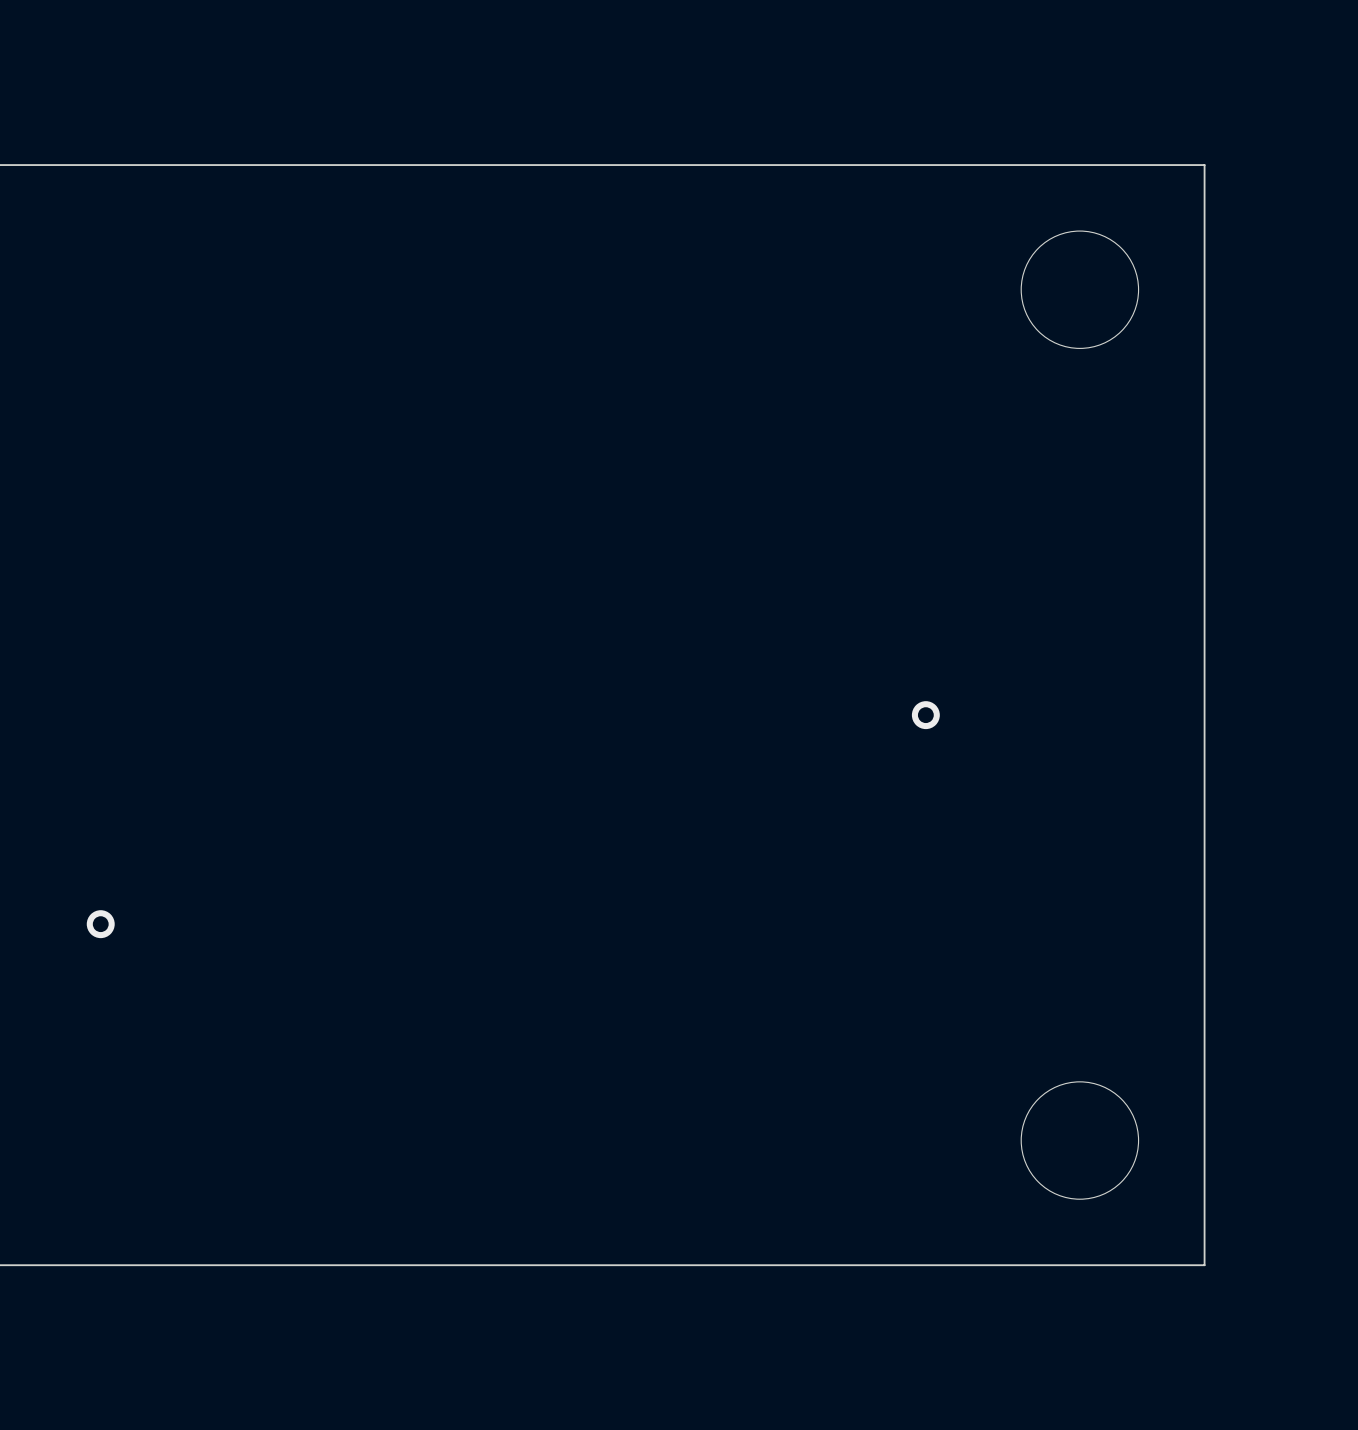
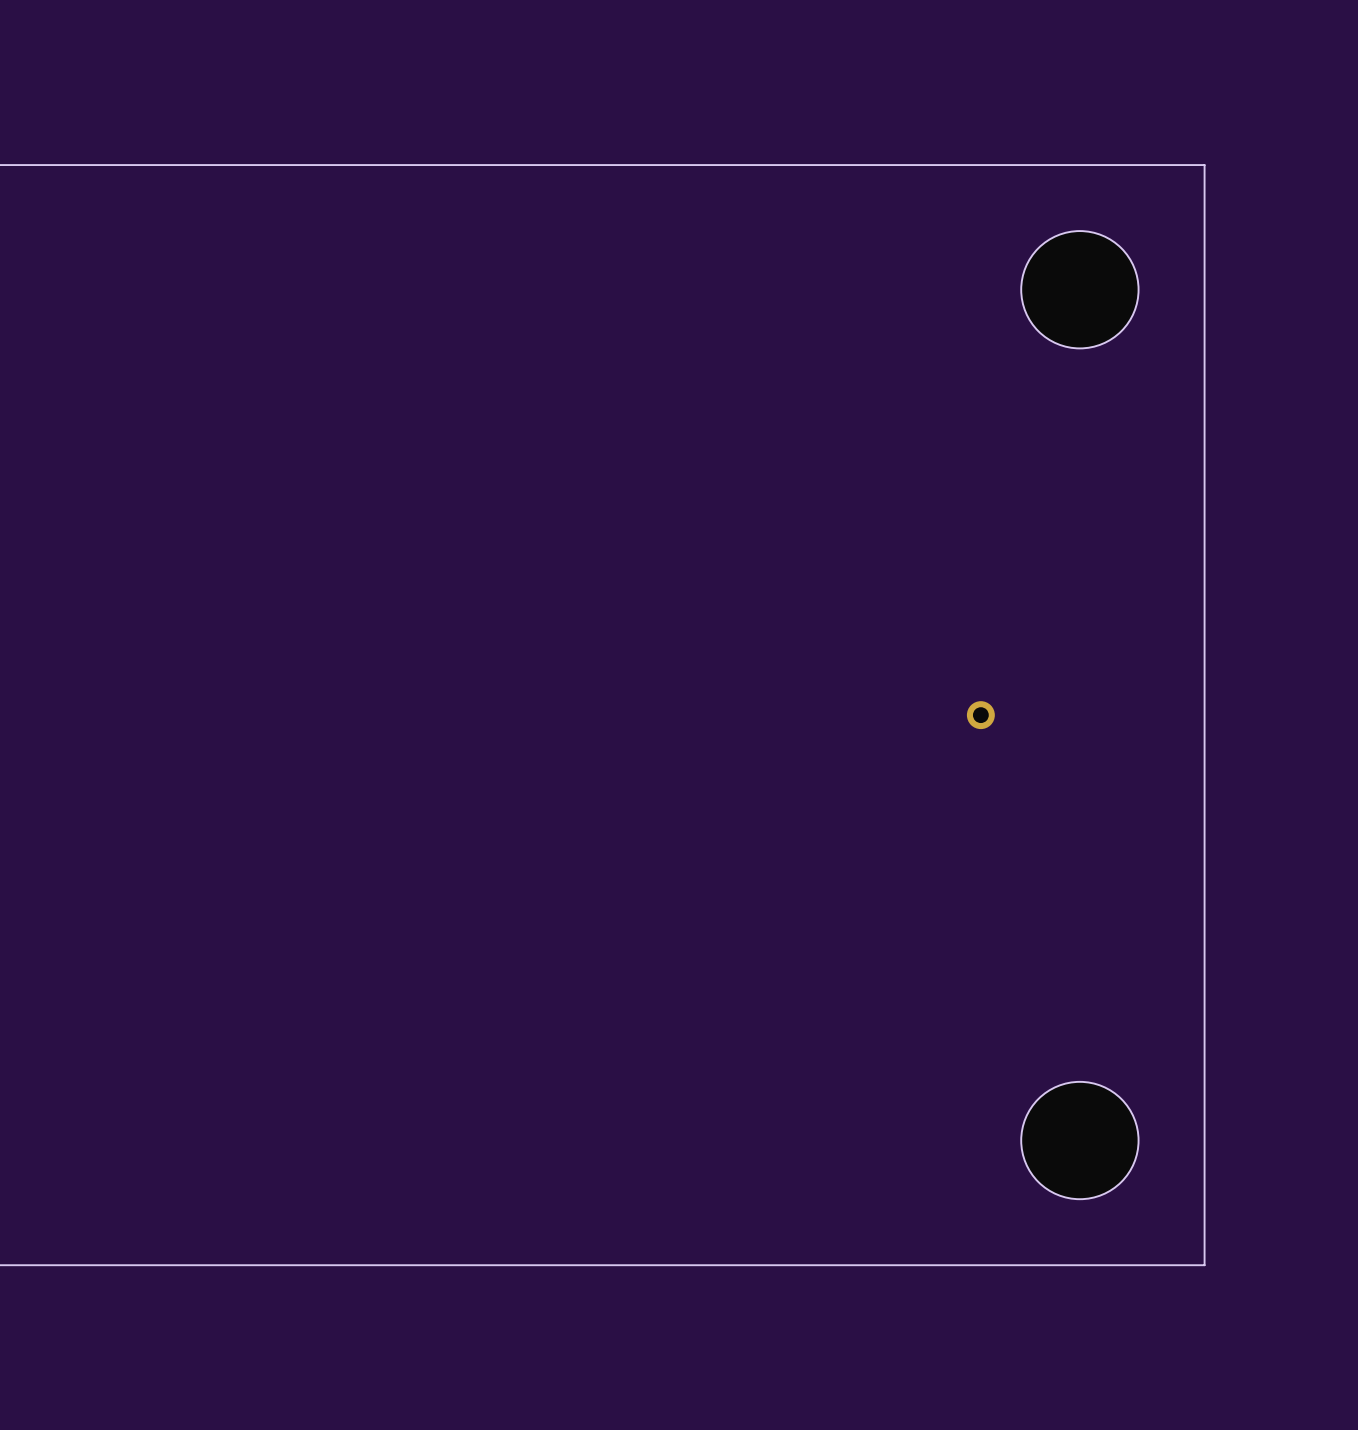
via position: (925, 715) -> (980, 715)
via: (100, 924) -> none

